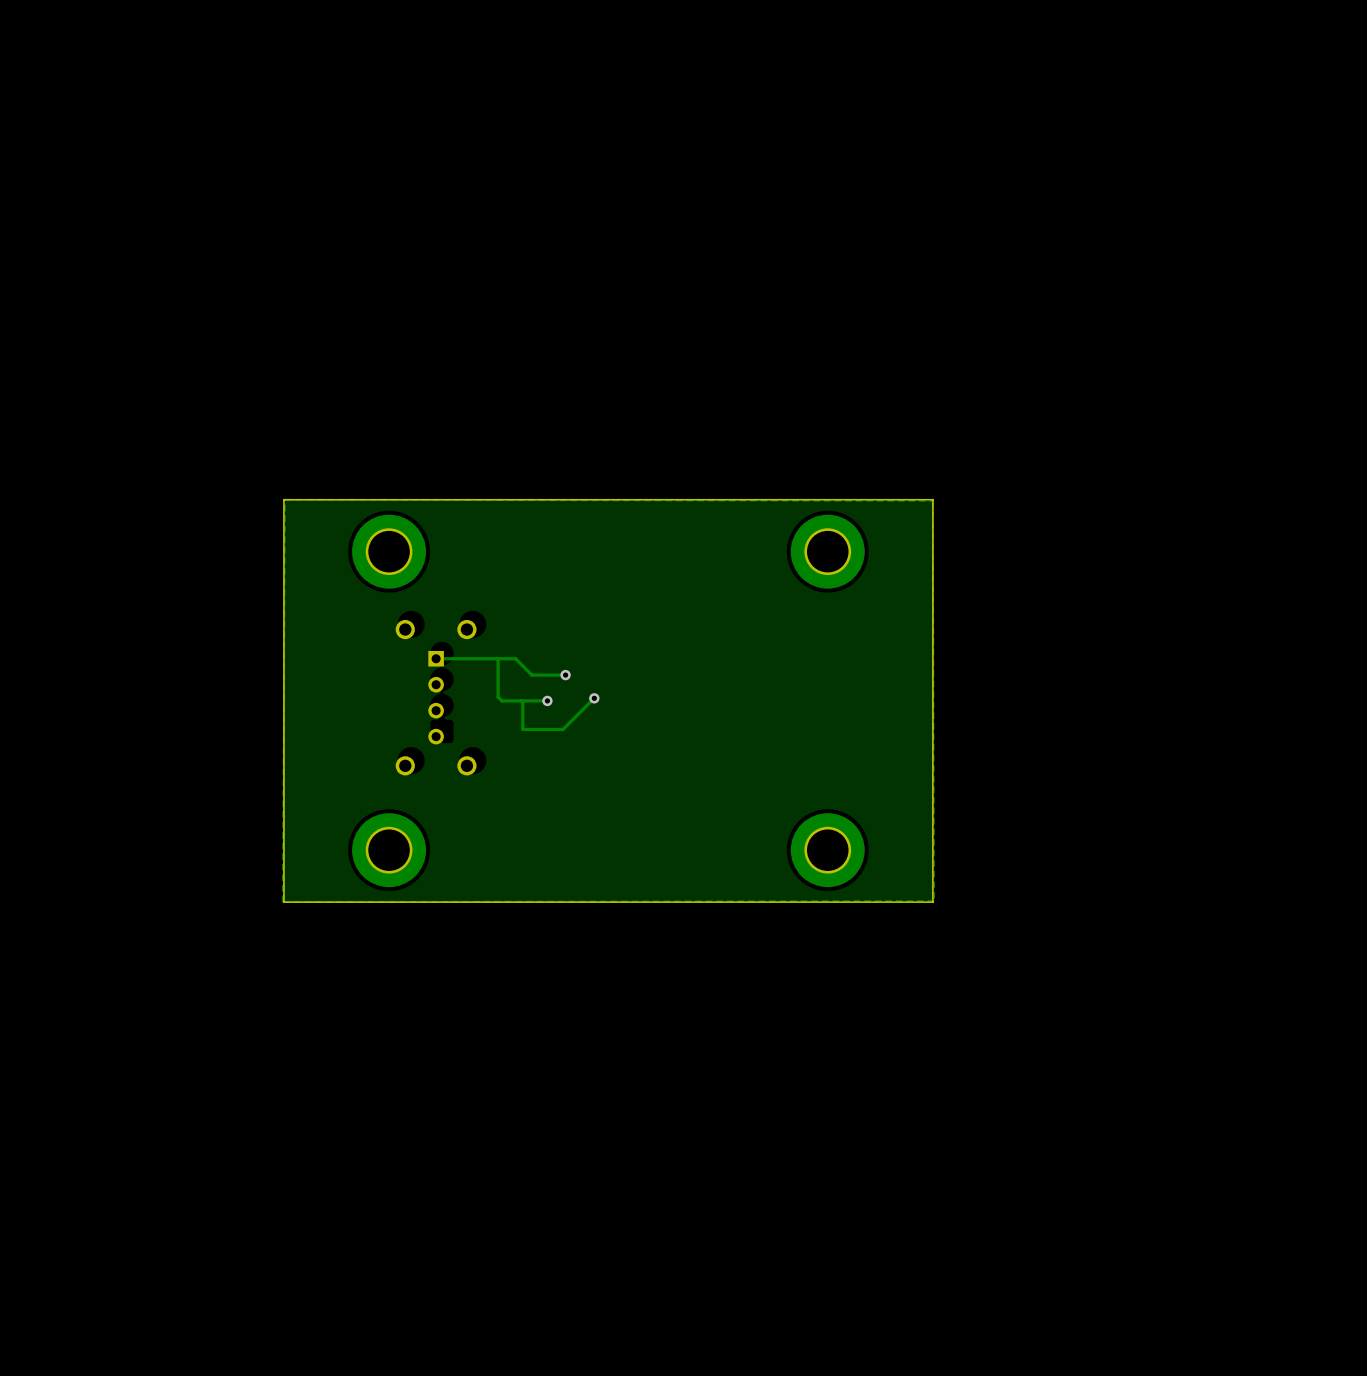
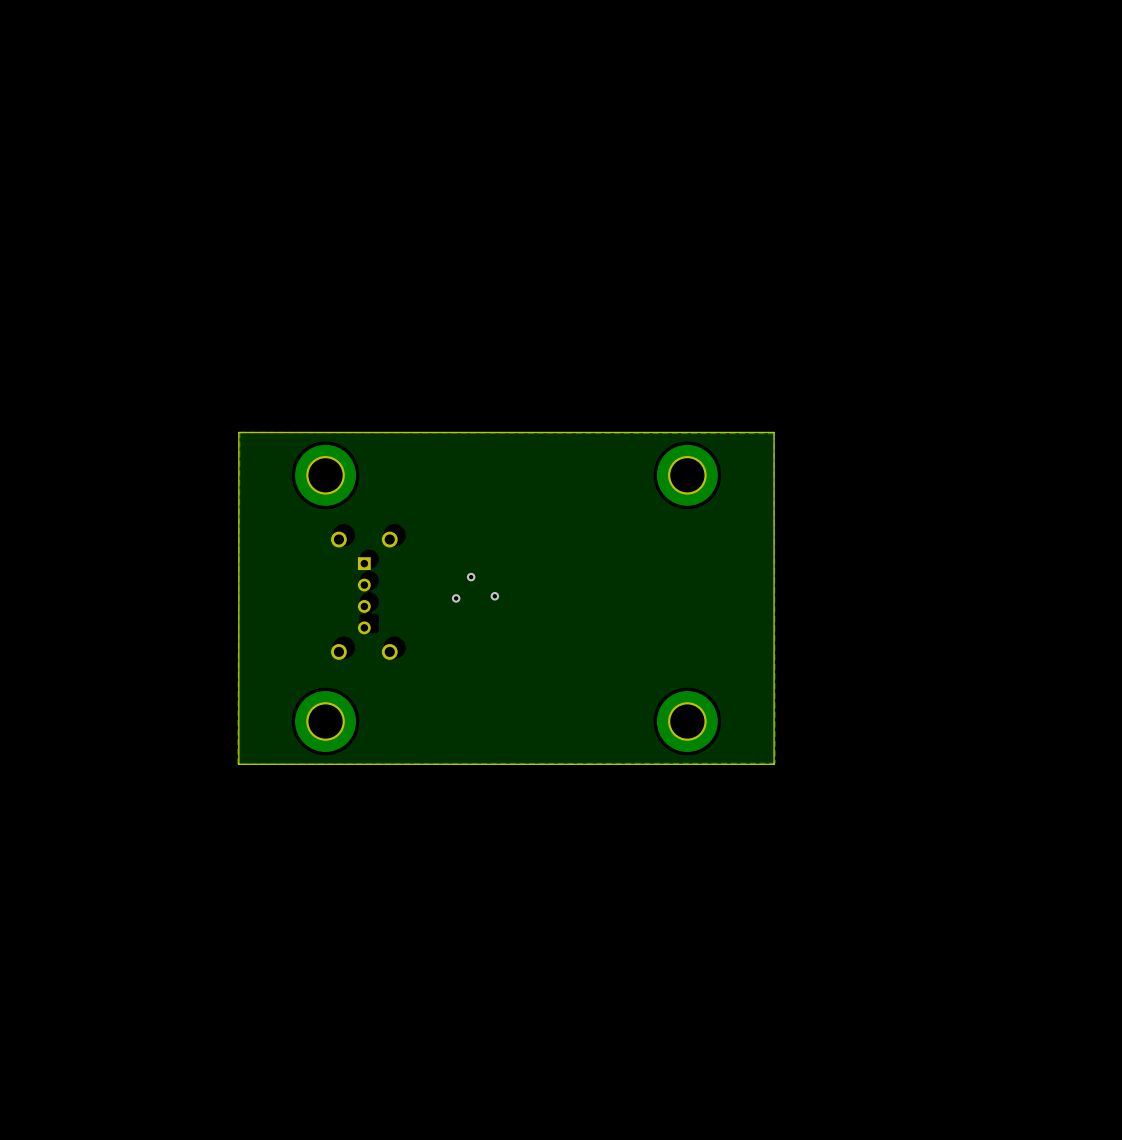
track: (436, 658) (515, 658) (531, 675) (565, 675) -> none
track: (496, 658) (498, 697) (501, 700) (547, 700) -> none
track: (594, 698) (562, 729) (522, 729) (521, 700) -> none

